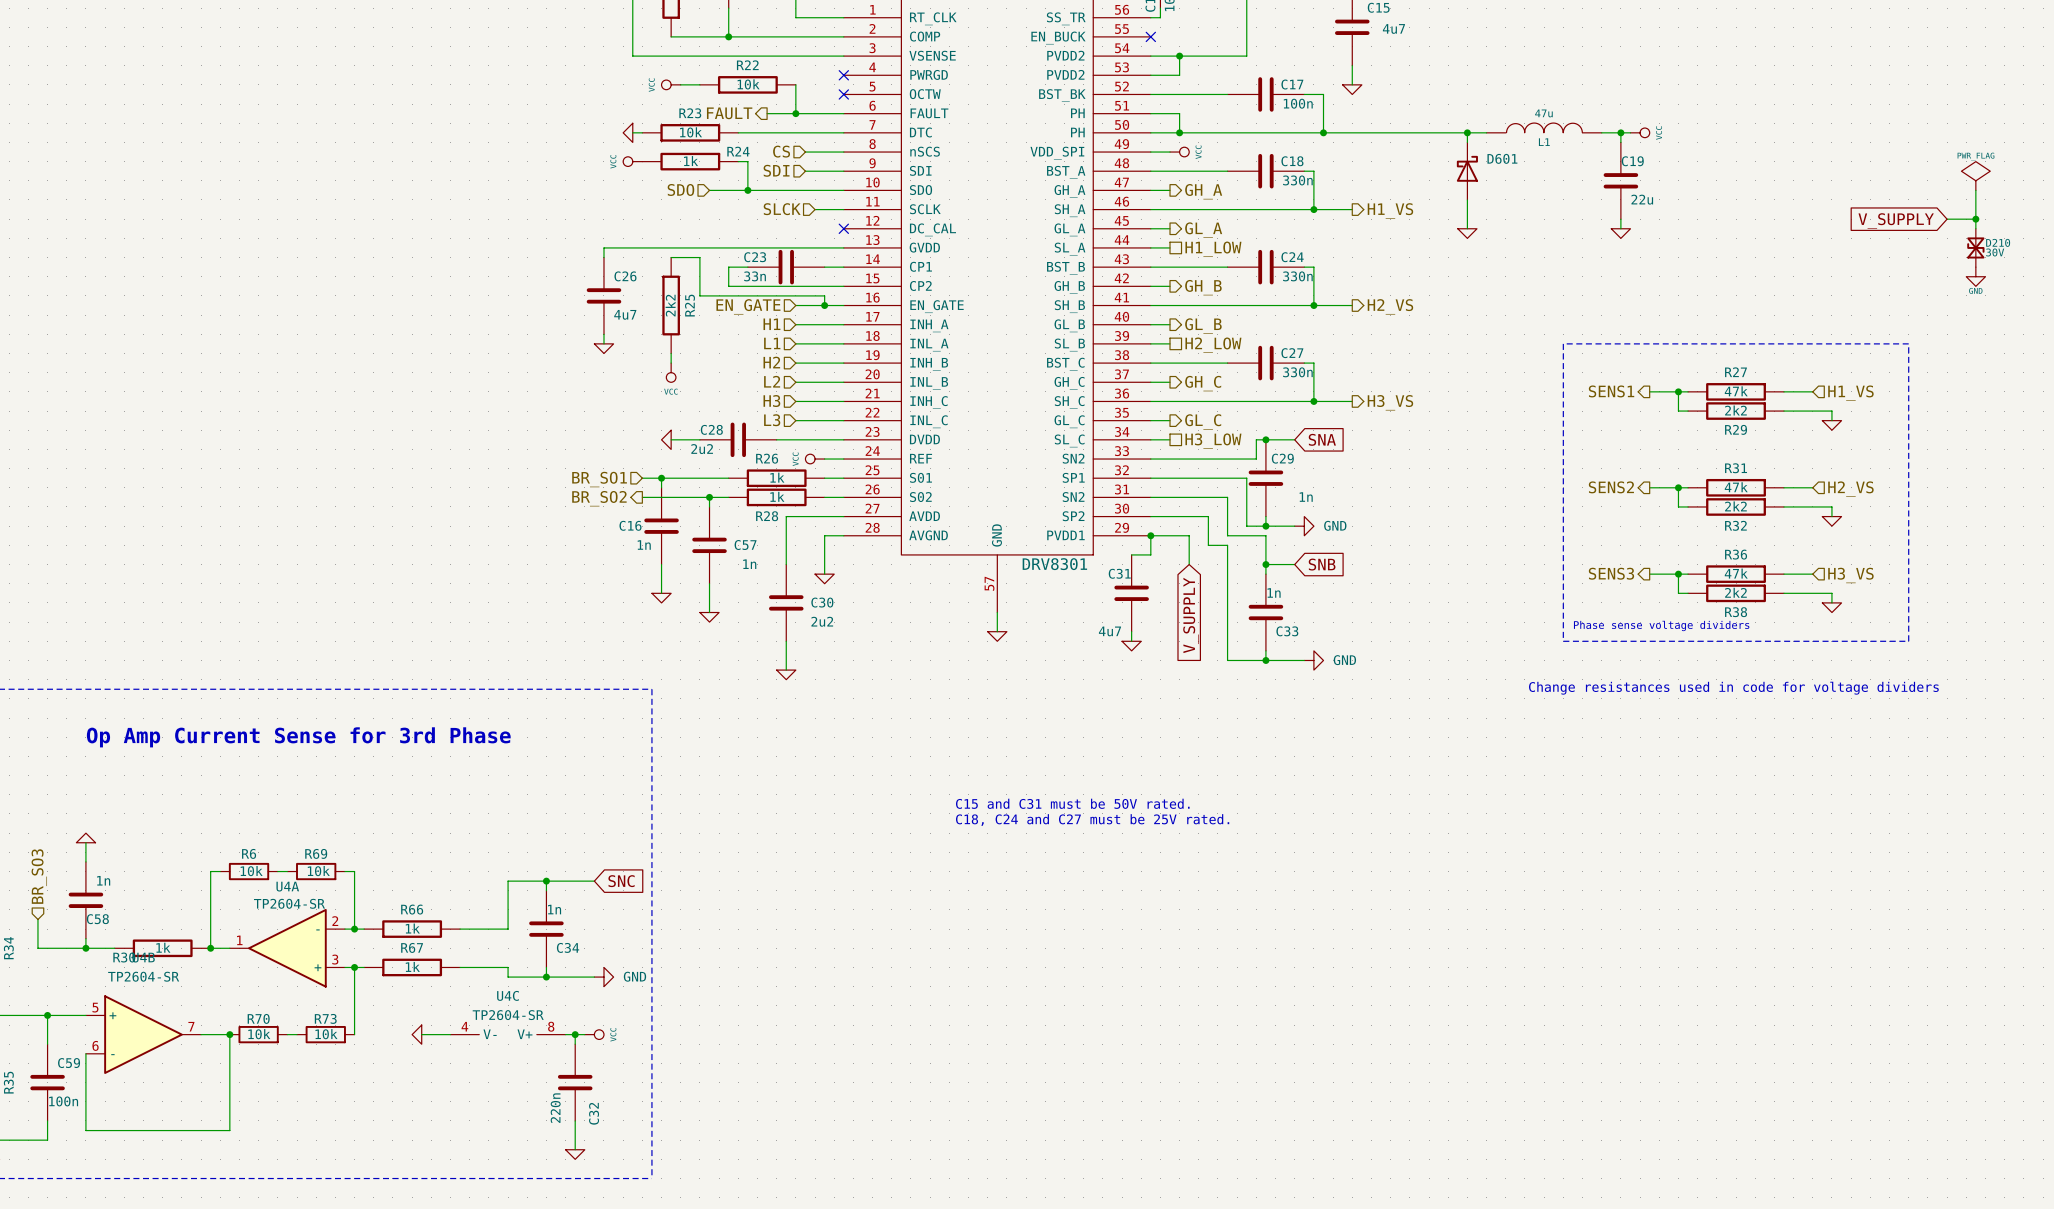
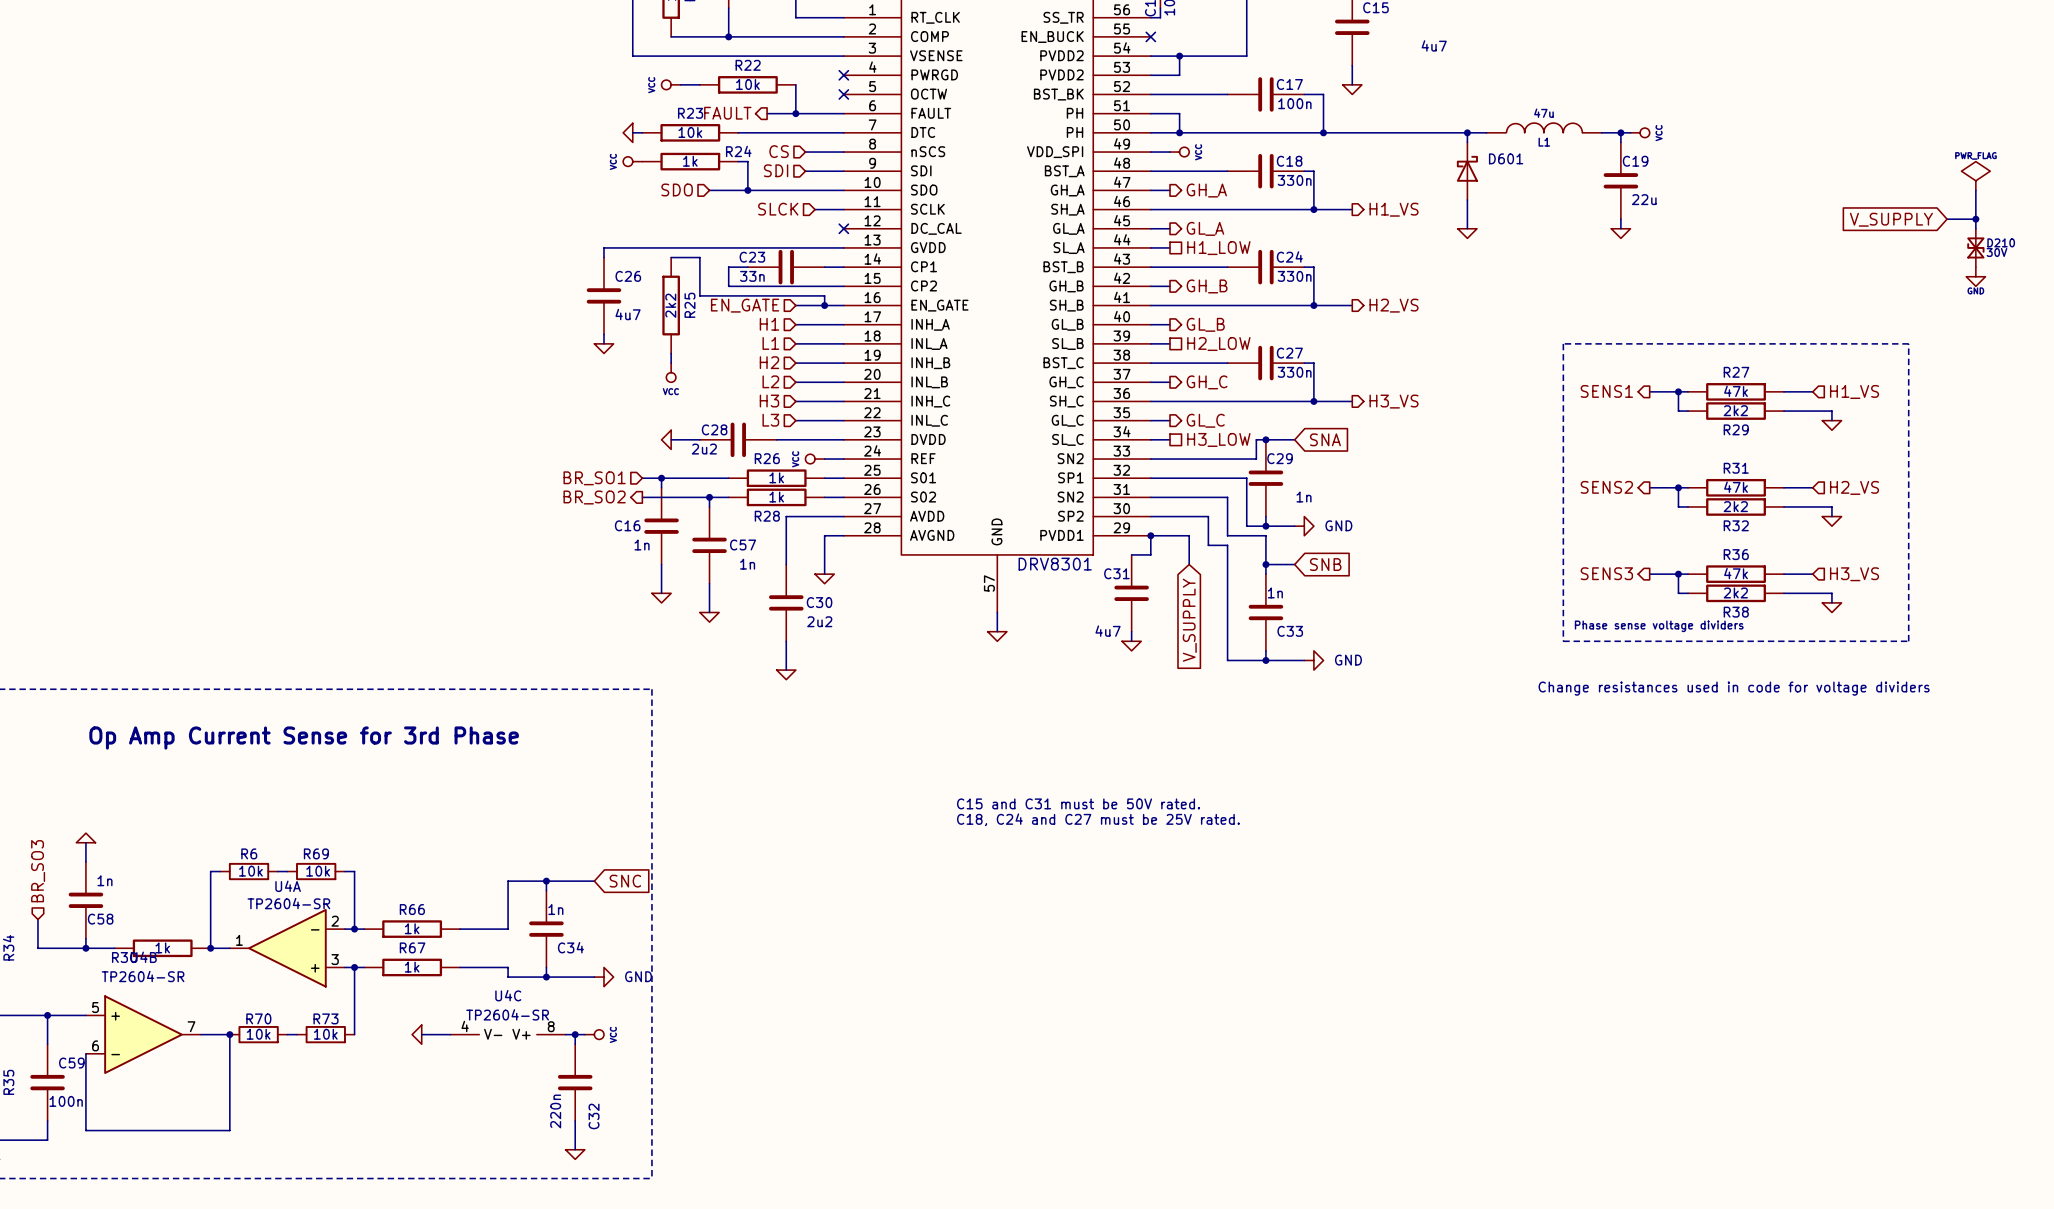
C15 value position: 4u7 (1393, 28) -> 4u7 (1434, 45)

